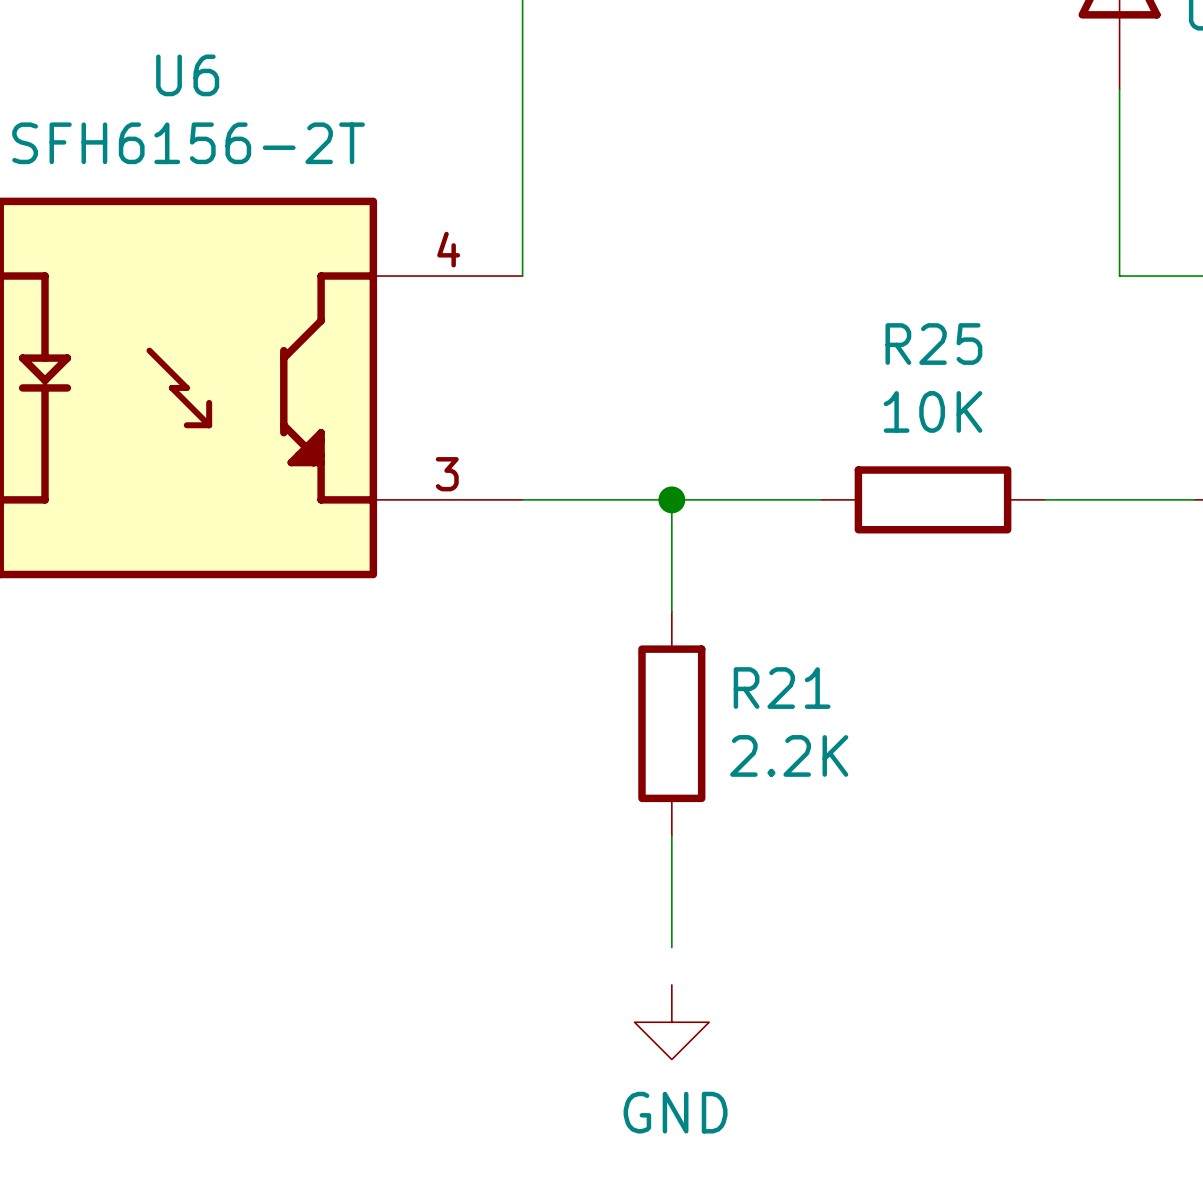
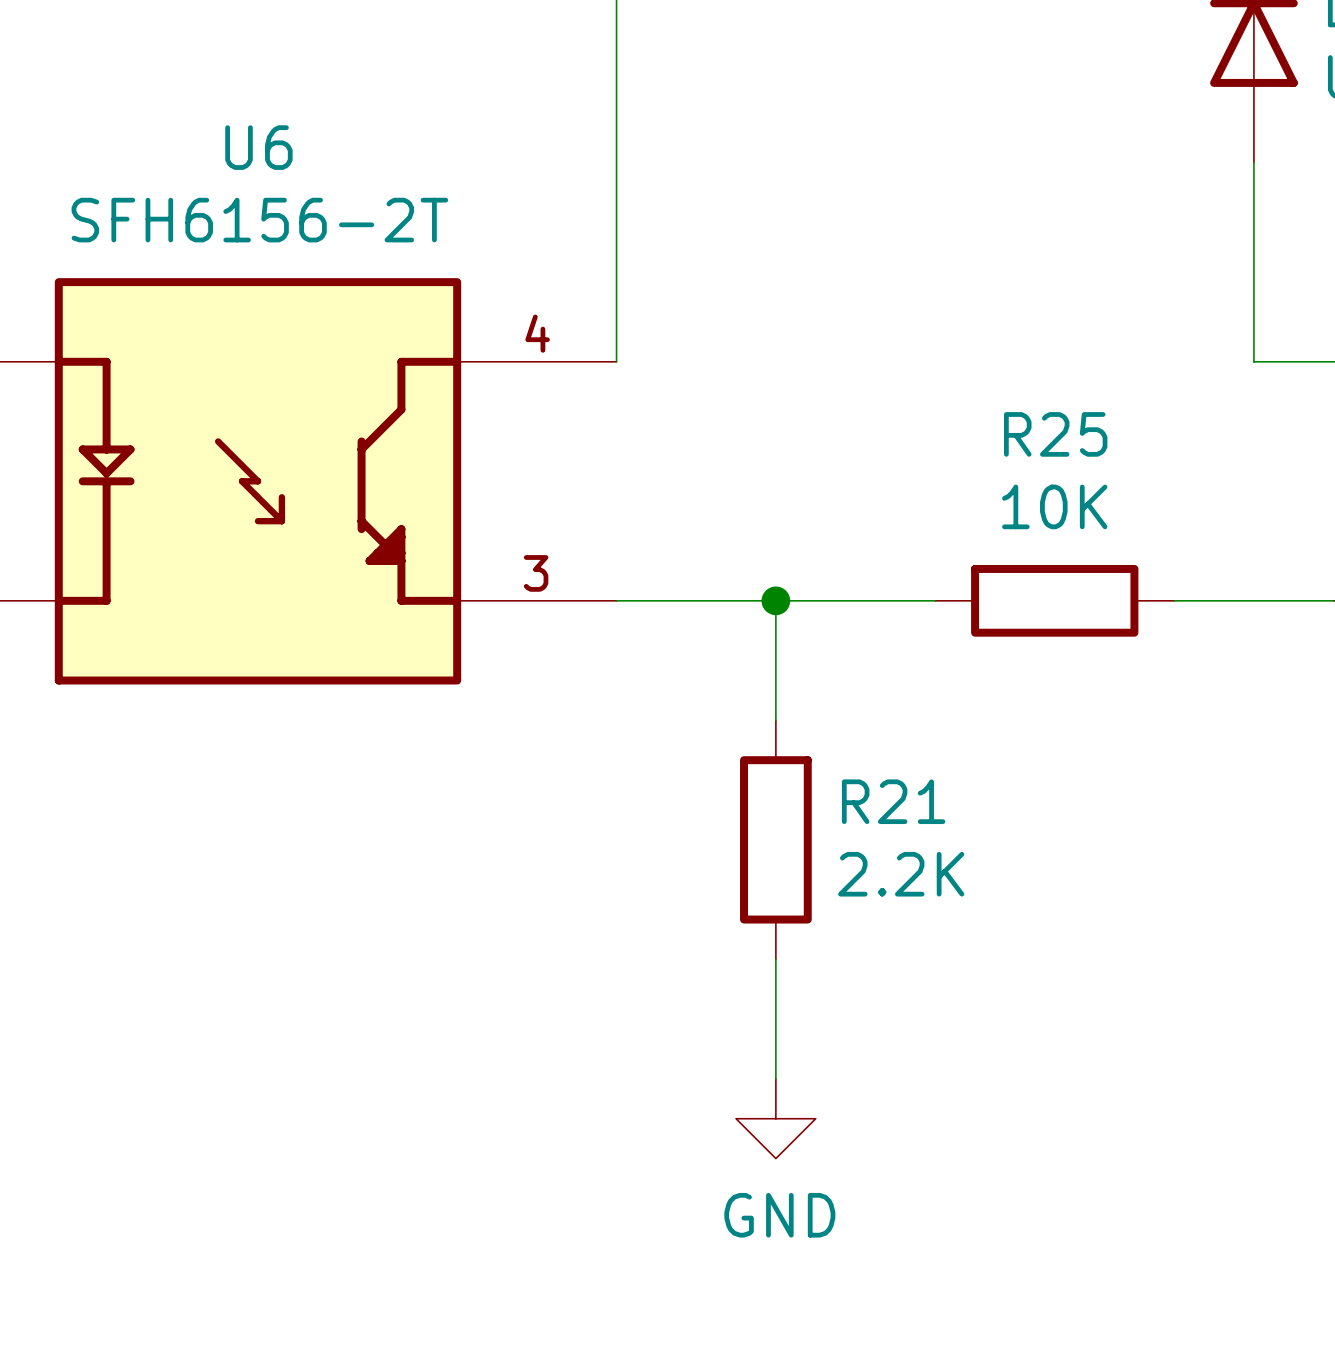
power symbol position: GND (671, 1022) -> GND (775, 1118)

